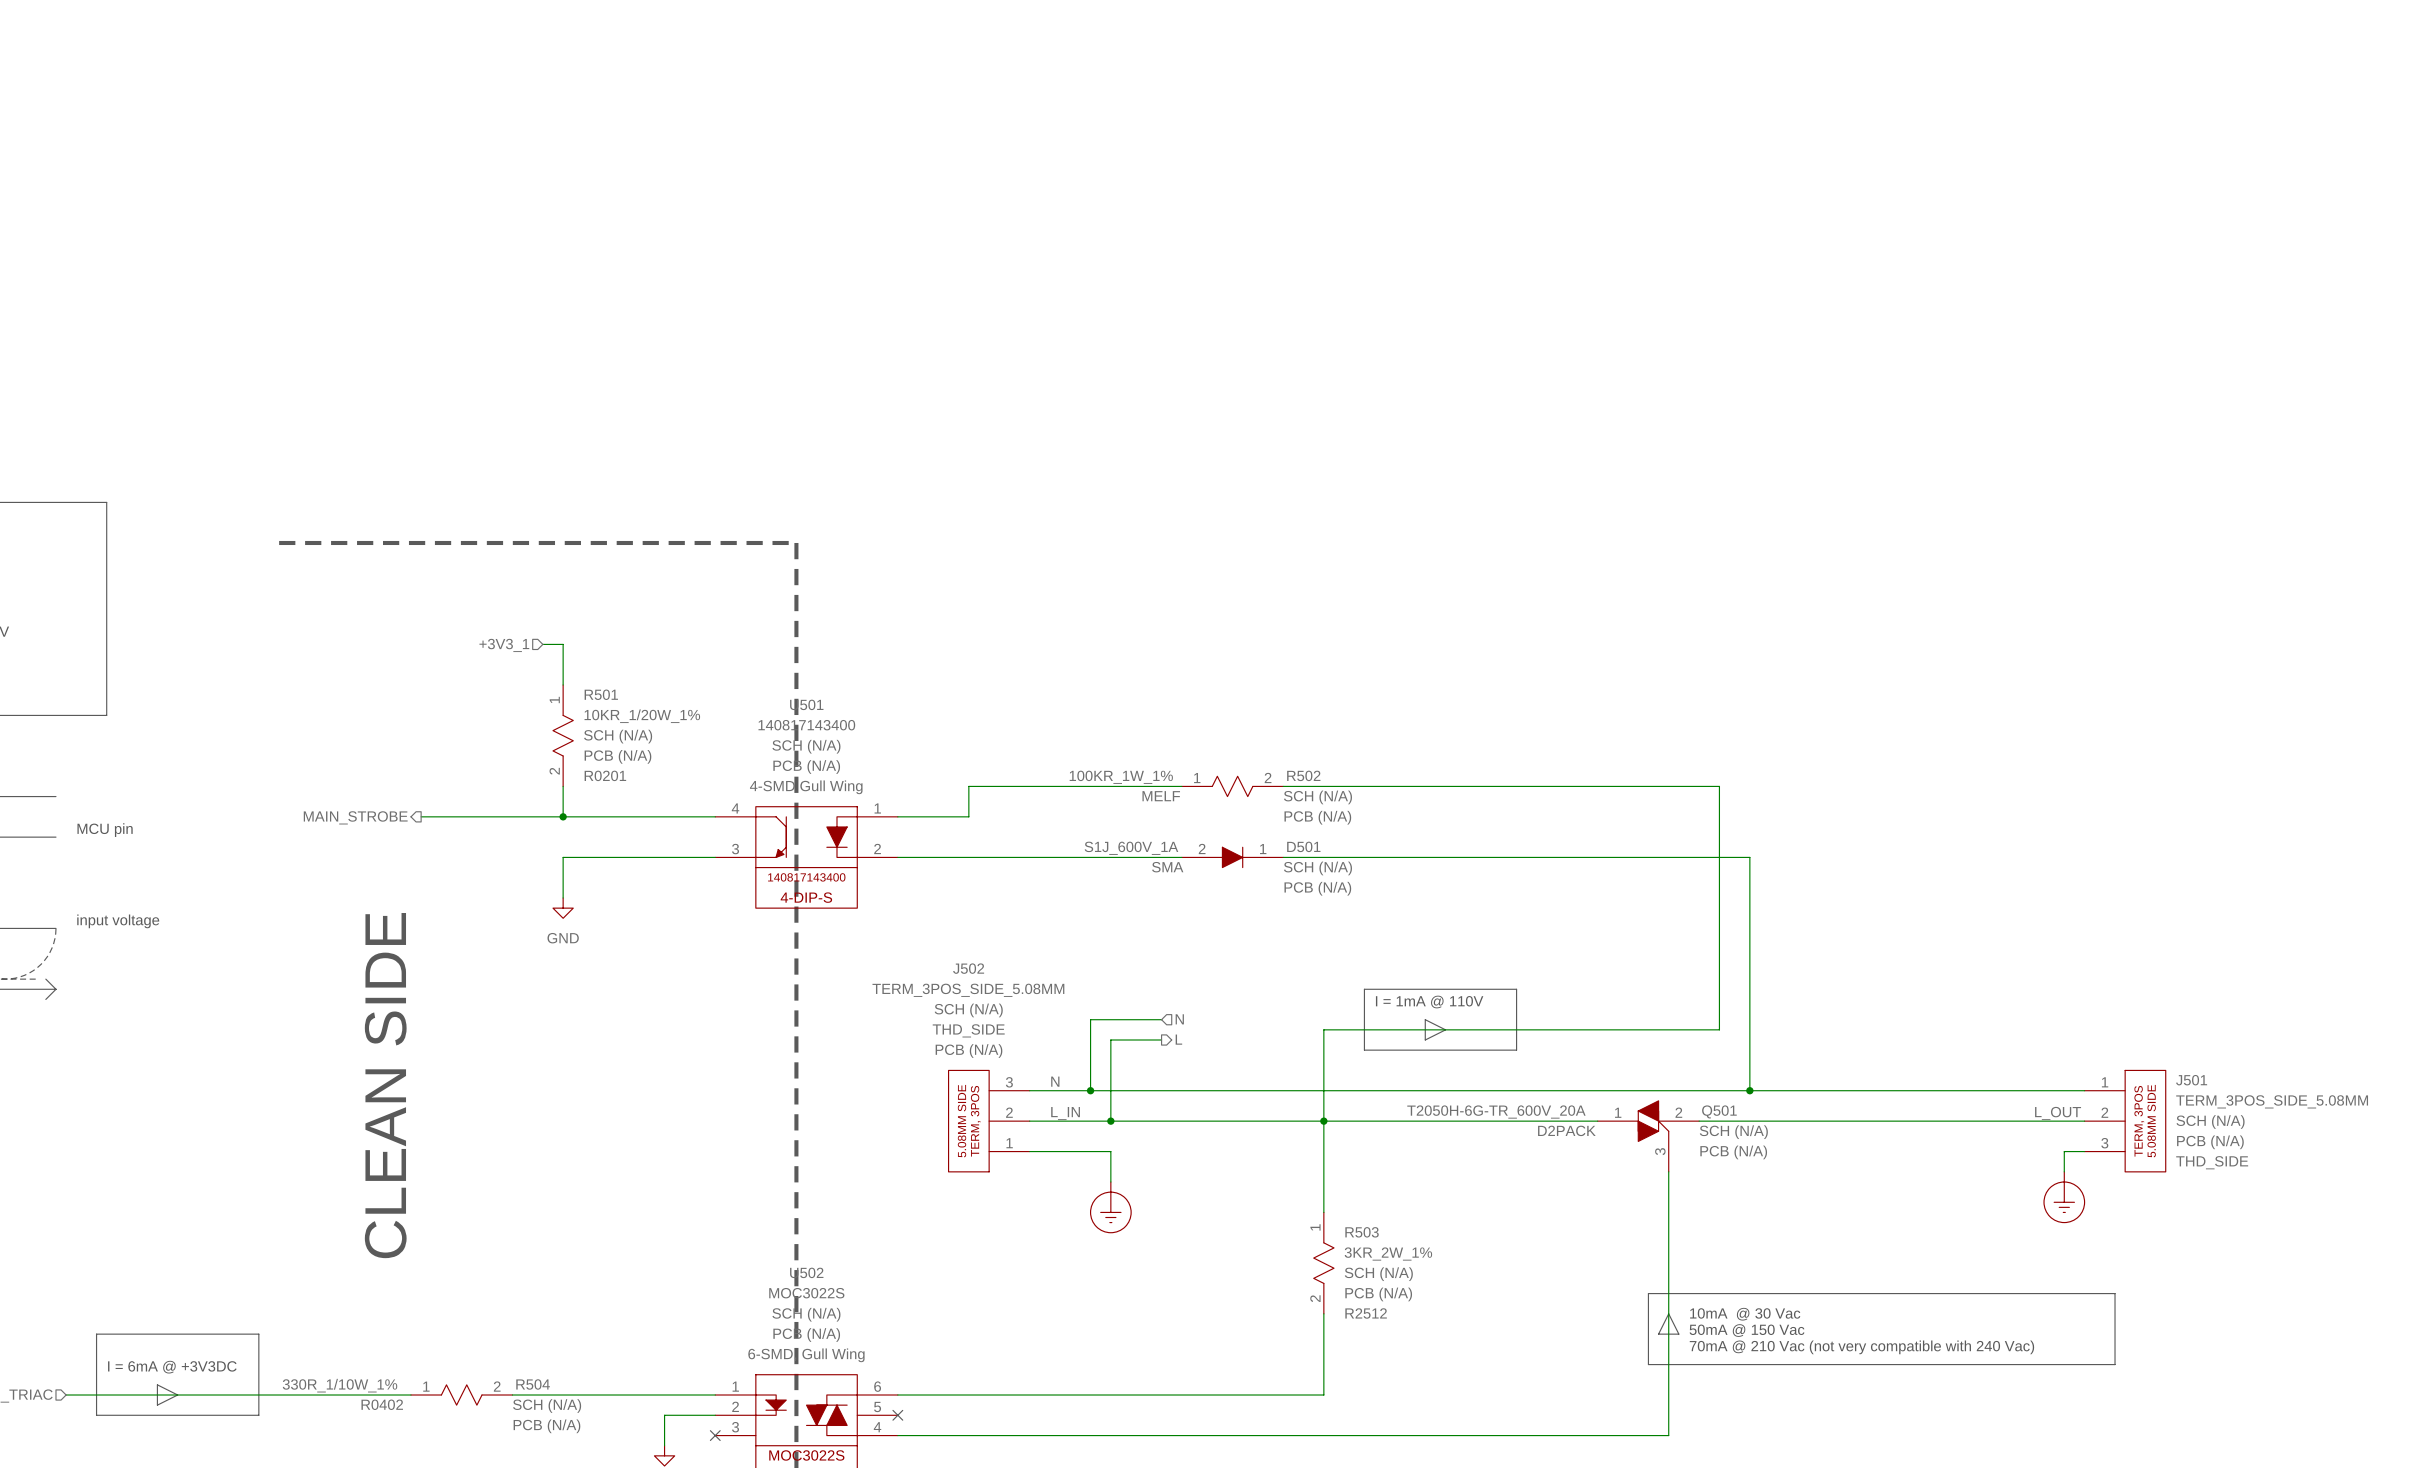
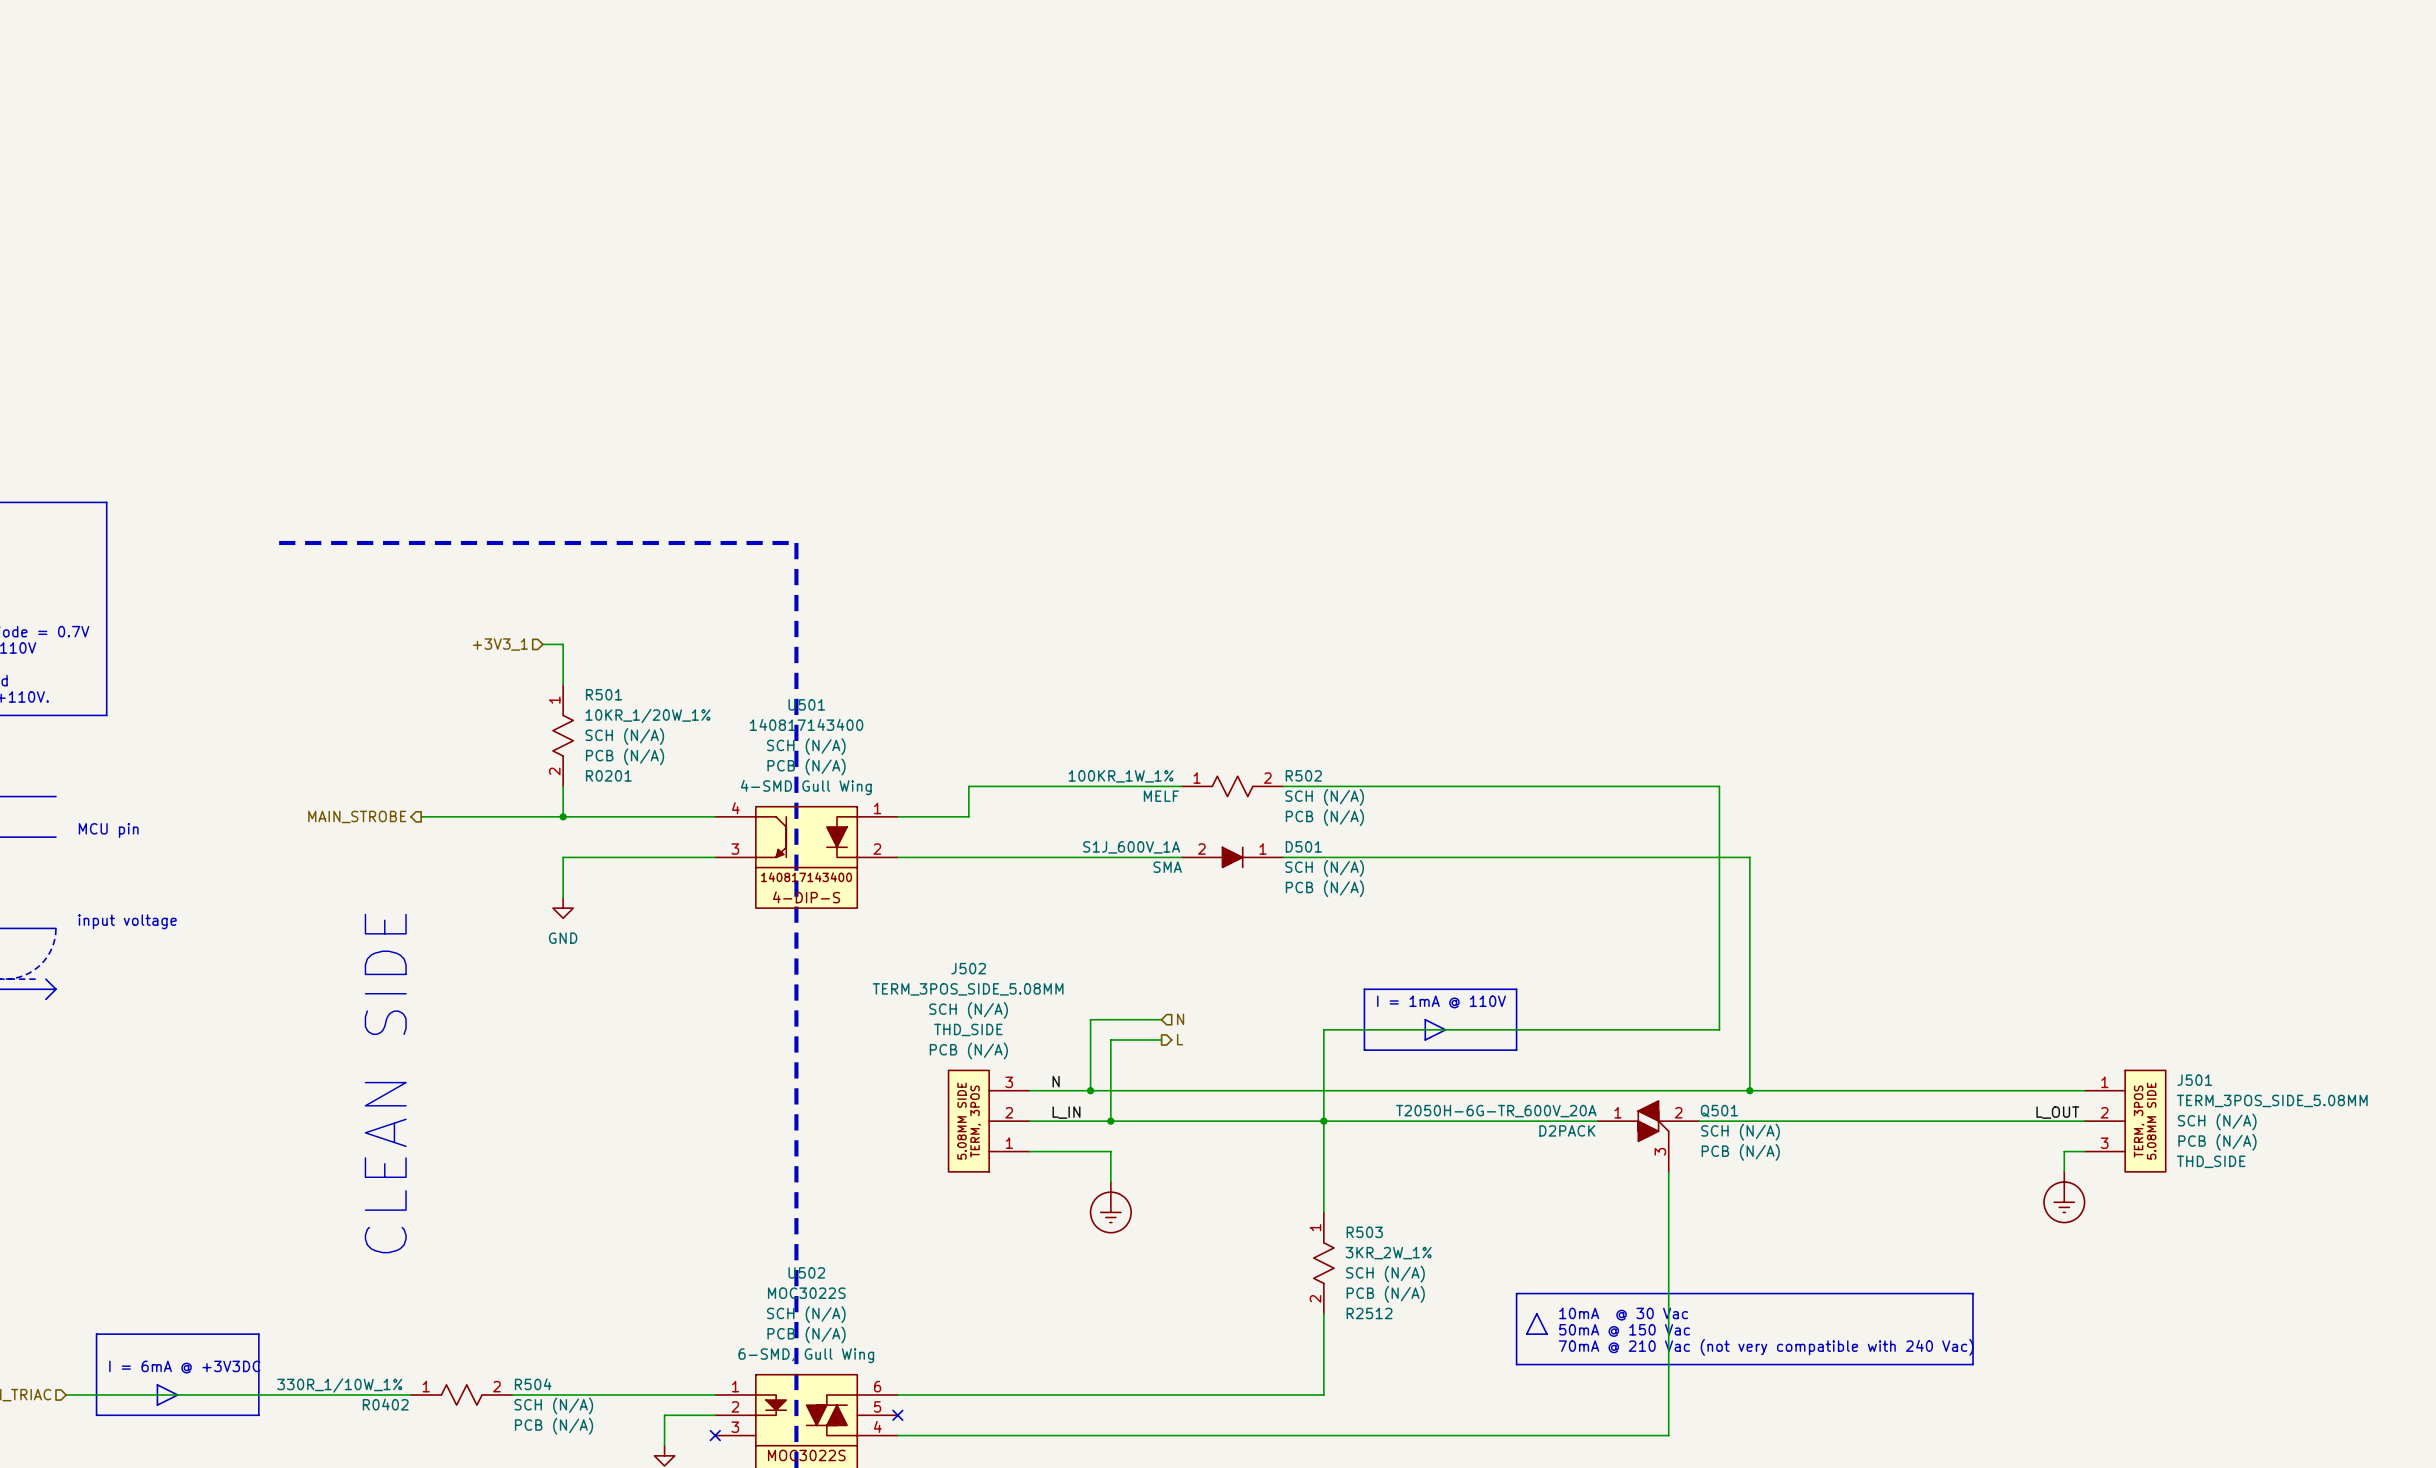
line: (1648, 1293) (1648, 1364) -> (1648, 1293) (1516, 1293) (1516, 1364) (1648, 1364)
line: (1973, 1293) (2115, 1293) (2115, 1364) (1973, 1364) -> (1973, 1293) (1973, 1364)
line: (1668, 1313) (1658, 1334) (1678, 1334) (1668, 1313) -> (1536, 1313) (1526, 1334) (1547, 1334) (1536, 1313)
text position: 10mA @ 30 Vac (1745, 1314) -> 10mA @ 30 Vac (1623, 1314)
text position: 50mA @ 150 Vac (1746, 1330) -> 50mA @ 150 Vac (1624, 1330)
text position: 70mA @ 210 Vac (not very compatible with 240 Vac) (1861, 1347) -> 70mA @ 210 Vac (not very compatible with 240 Vac) (1766, 1347)

